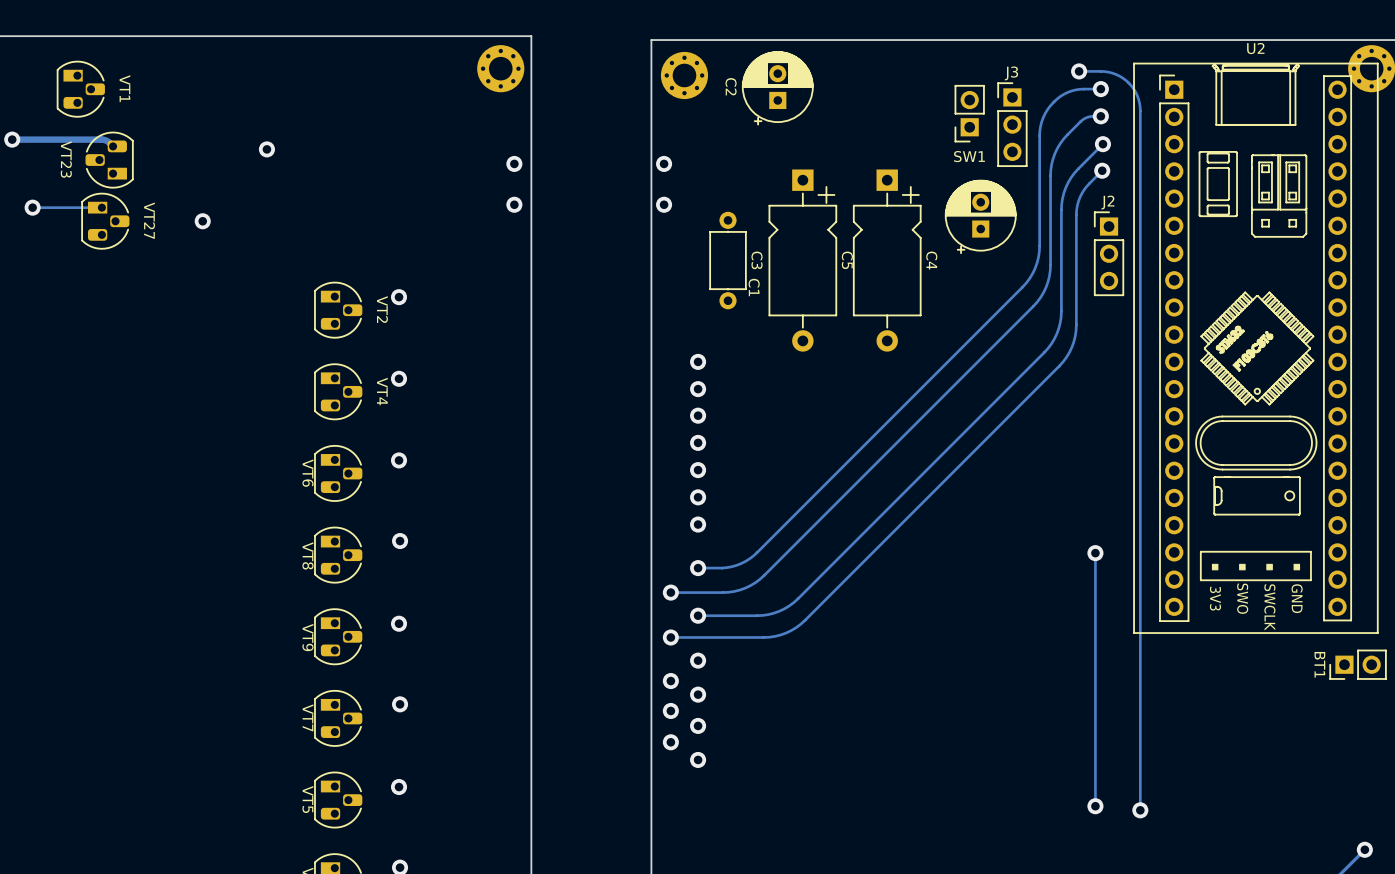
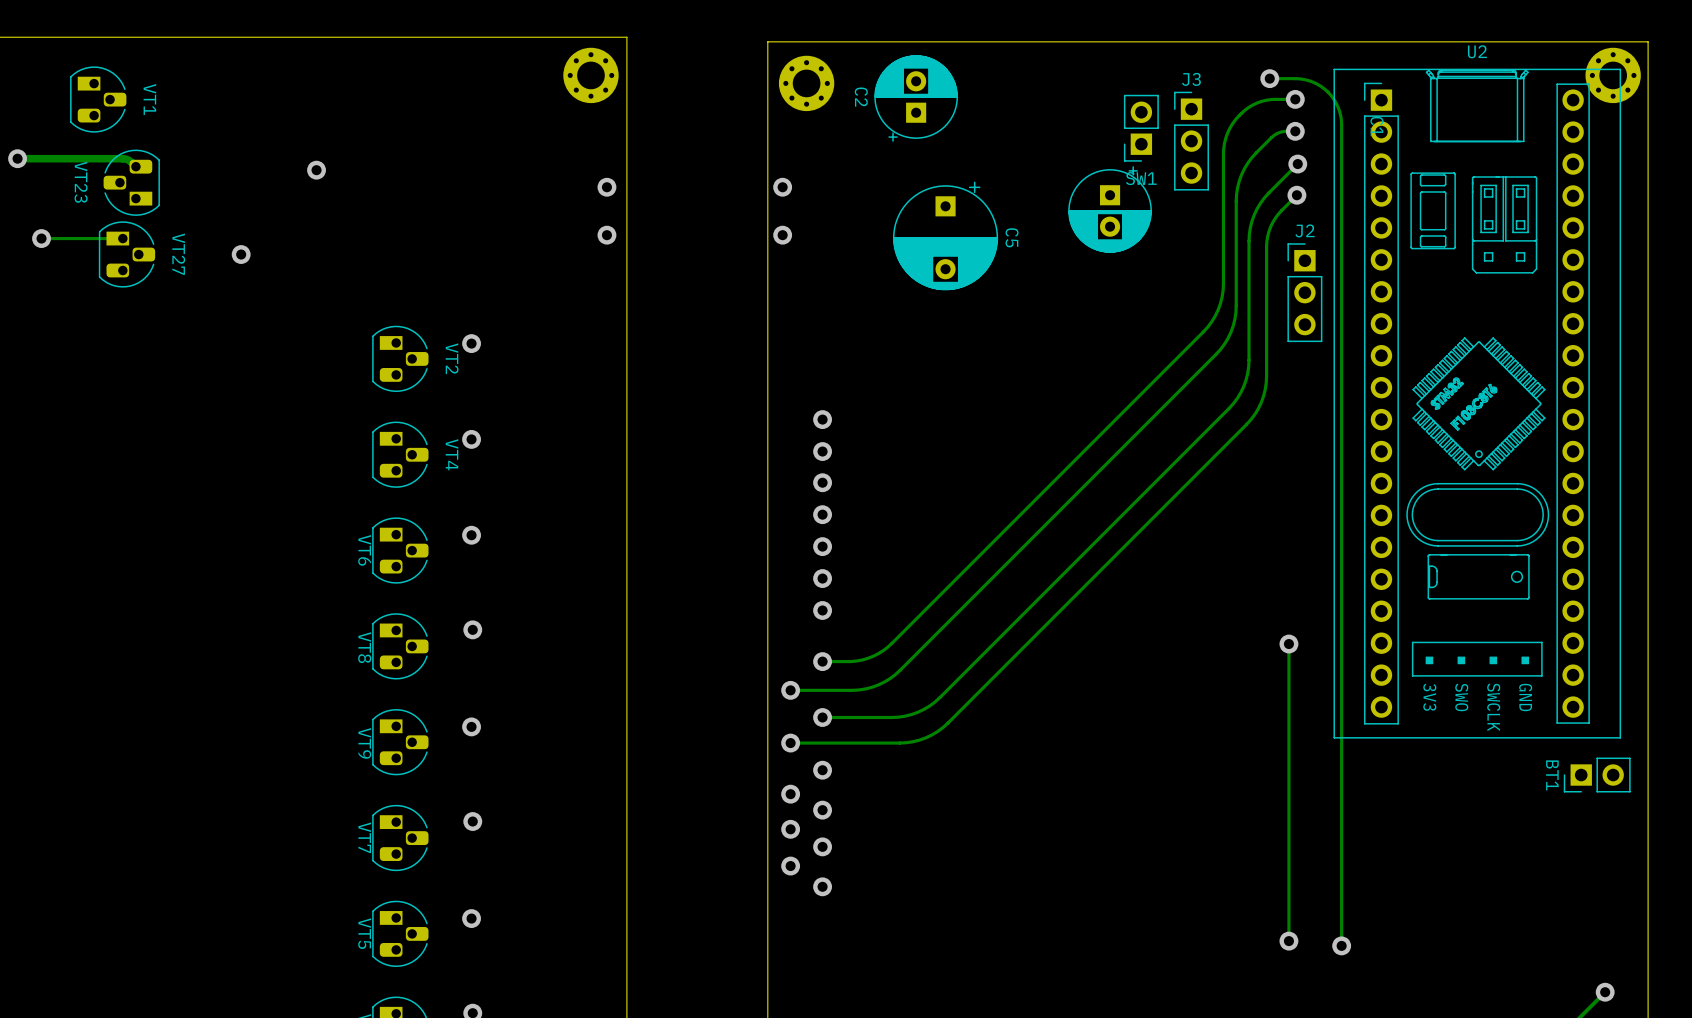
C5 footprint: [768, 169, 837, 352] -> [892, 181, 999, 291]
C1 rotation: 0° (980, 216) -> 180° (1110, 209)
C1 position: (980, 216) -> (1110, 209)
C3: (728, 260) -> none
C4: (887, 260) -> none

